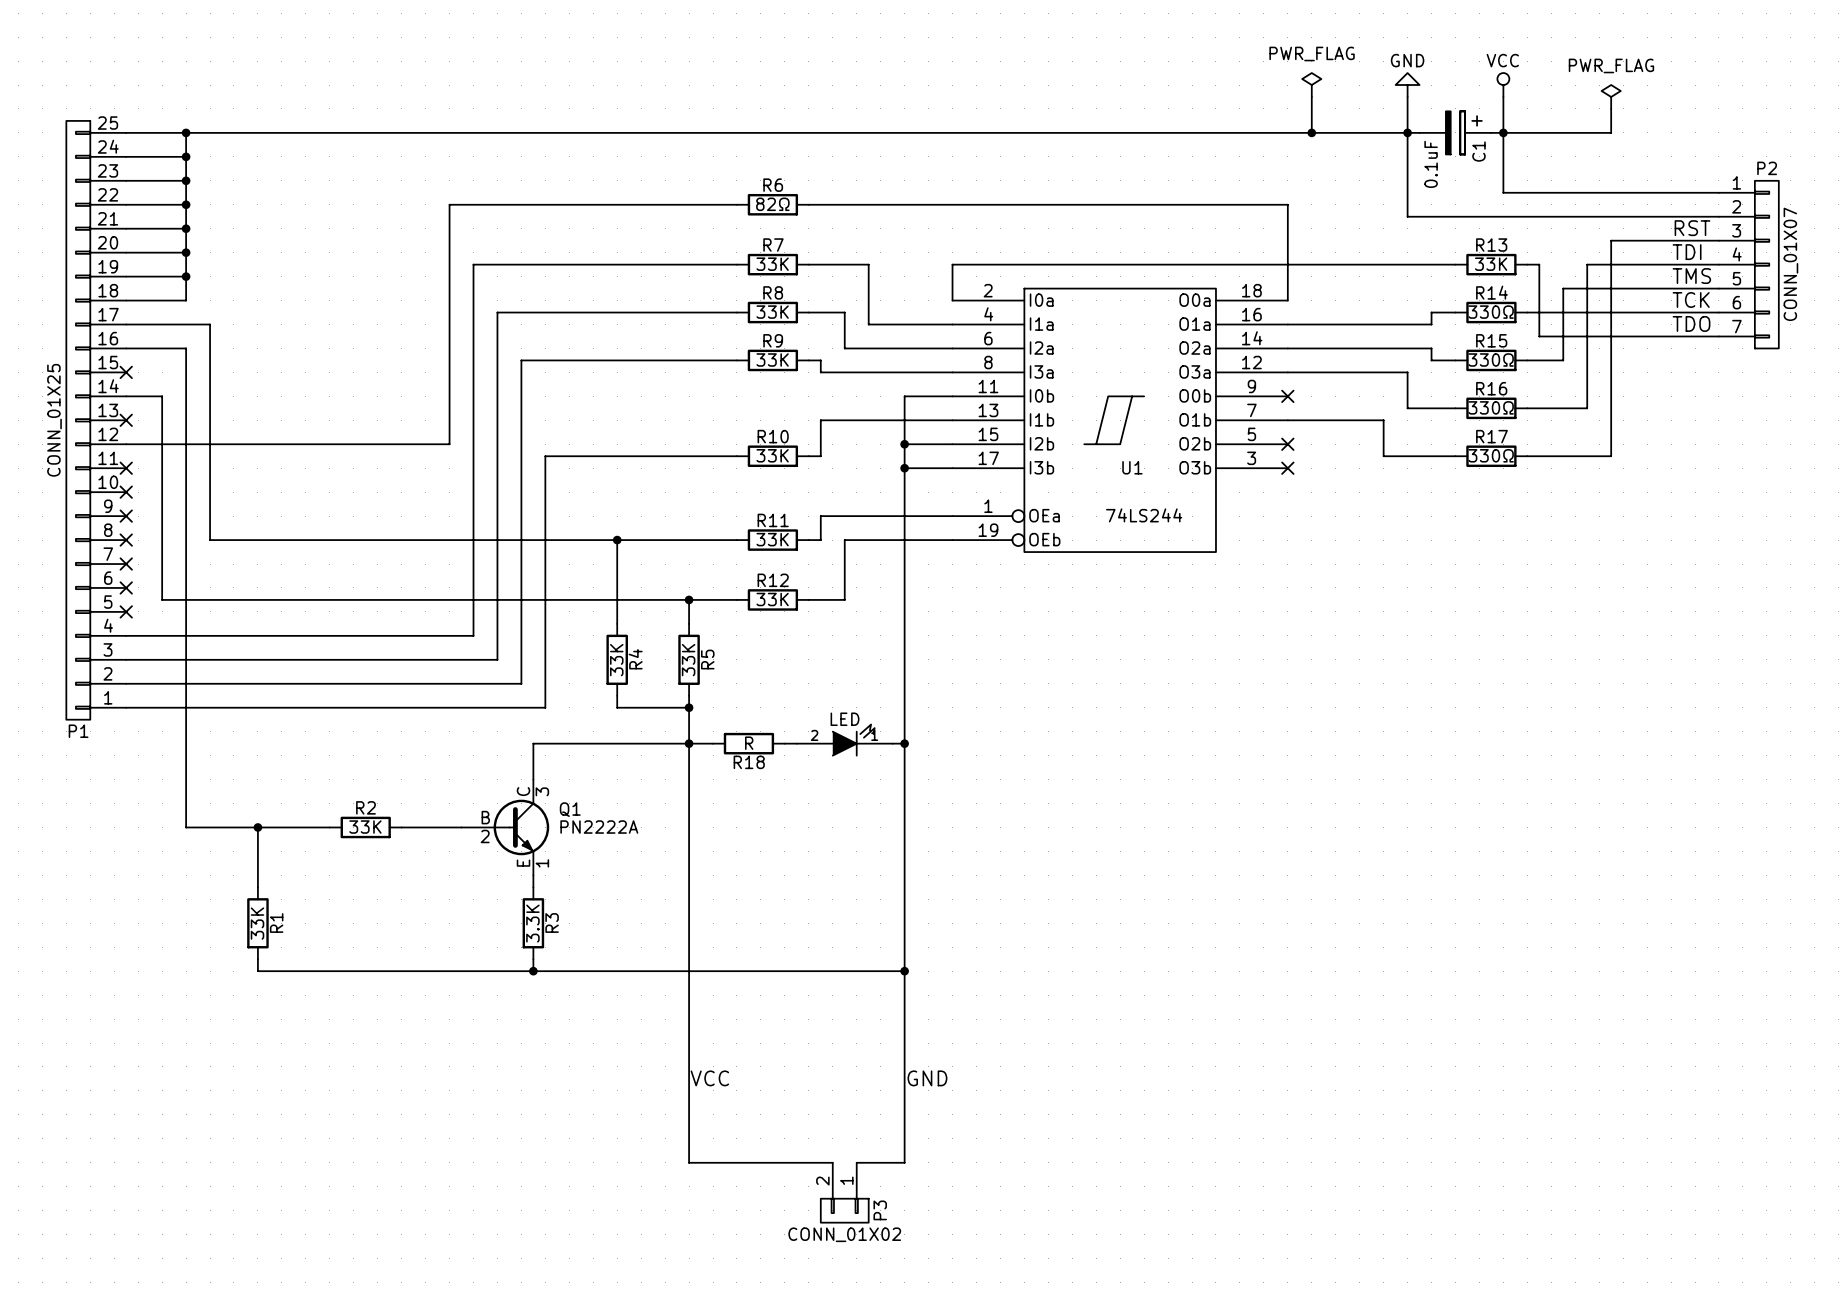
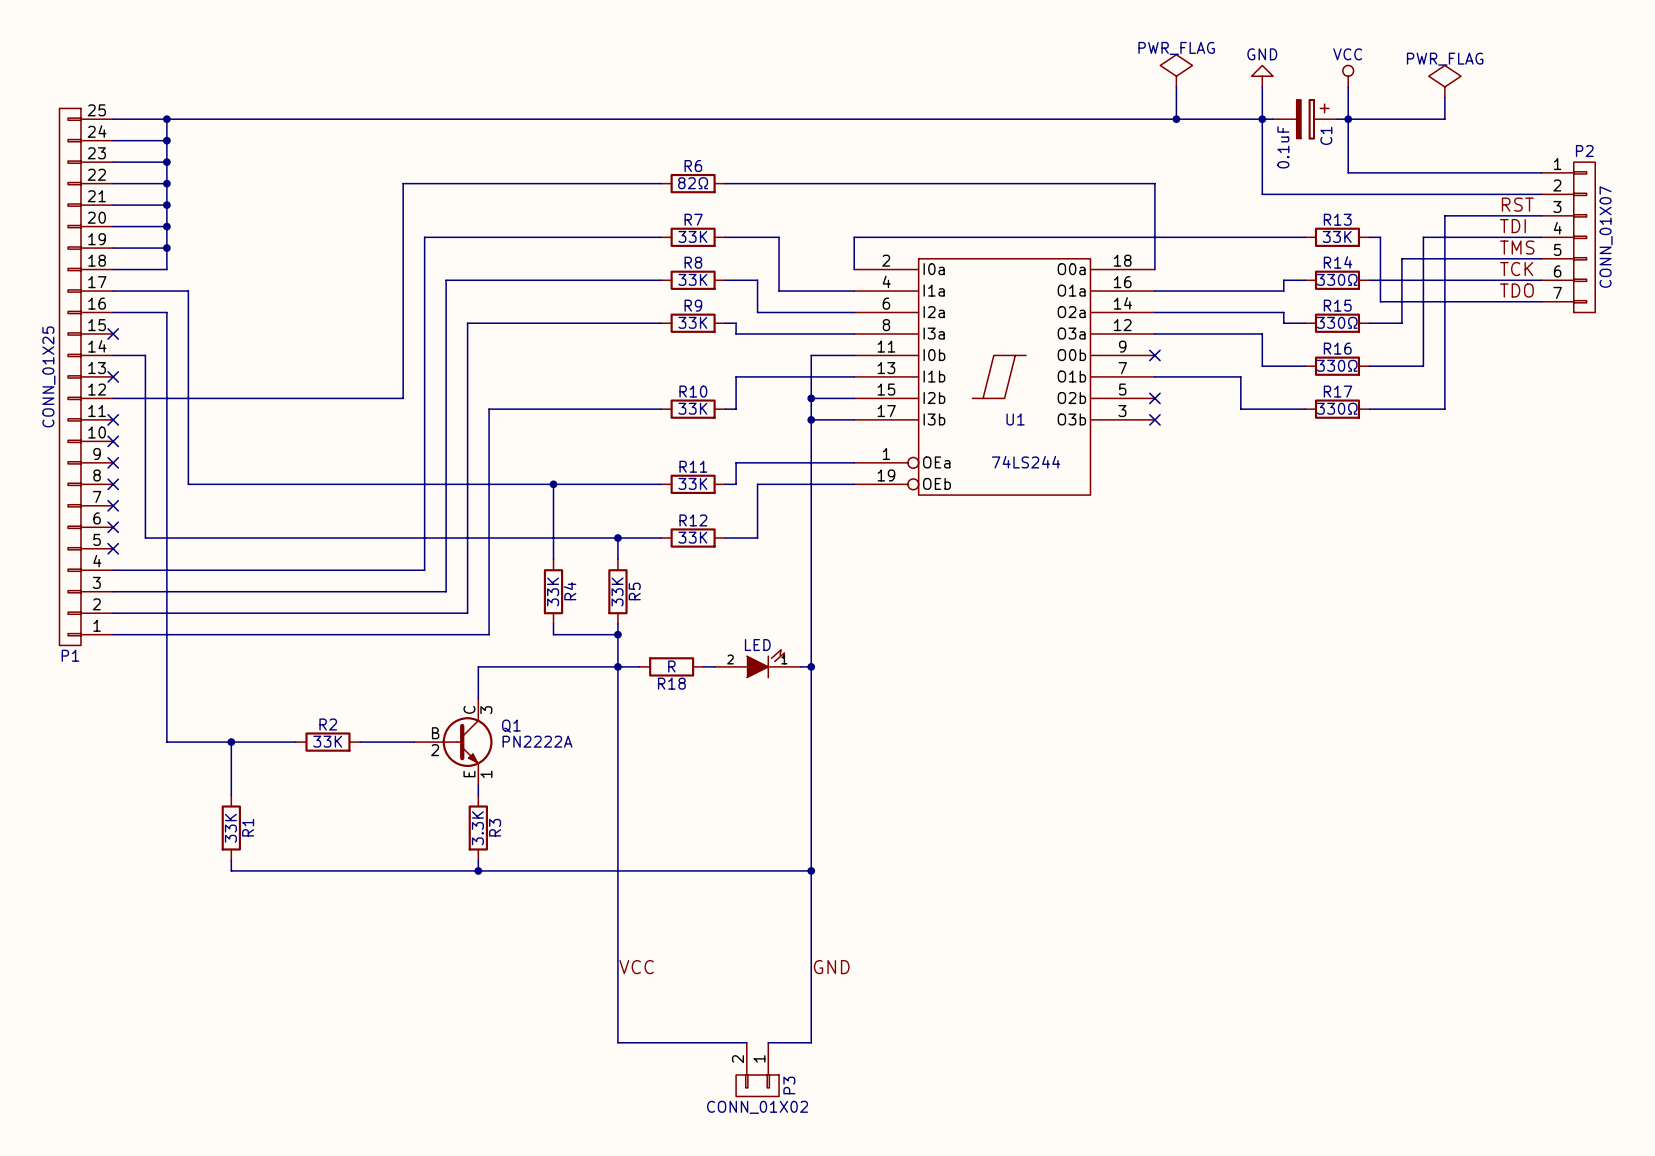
power symbol shape: [1302, 73, 1322, 97] -> [1160, 54, 1193, 87]
power symbol shape: [1601, 85, 1621, 109] -> [1428, 65, 1461, 98]

